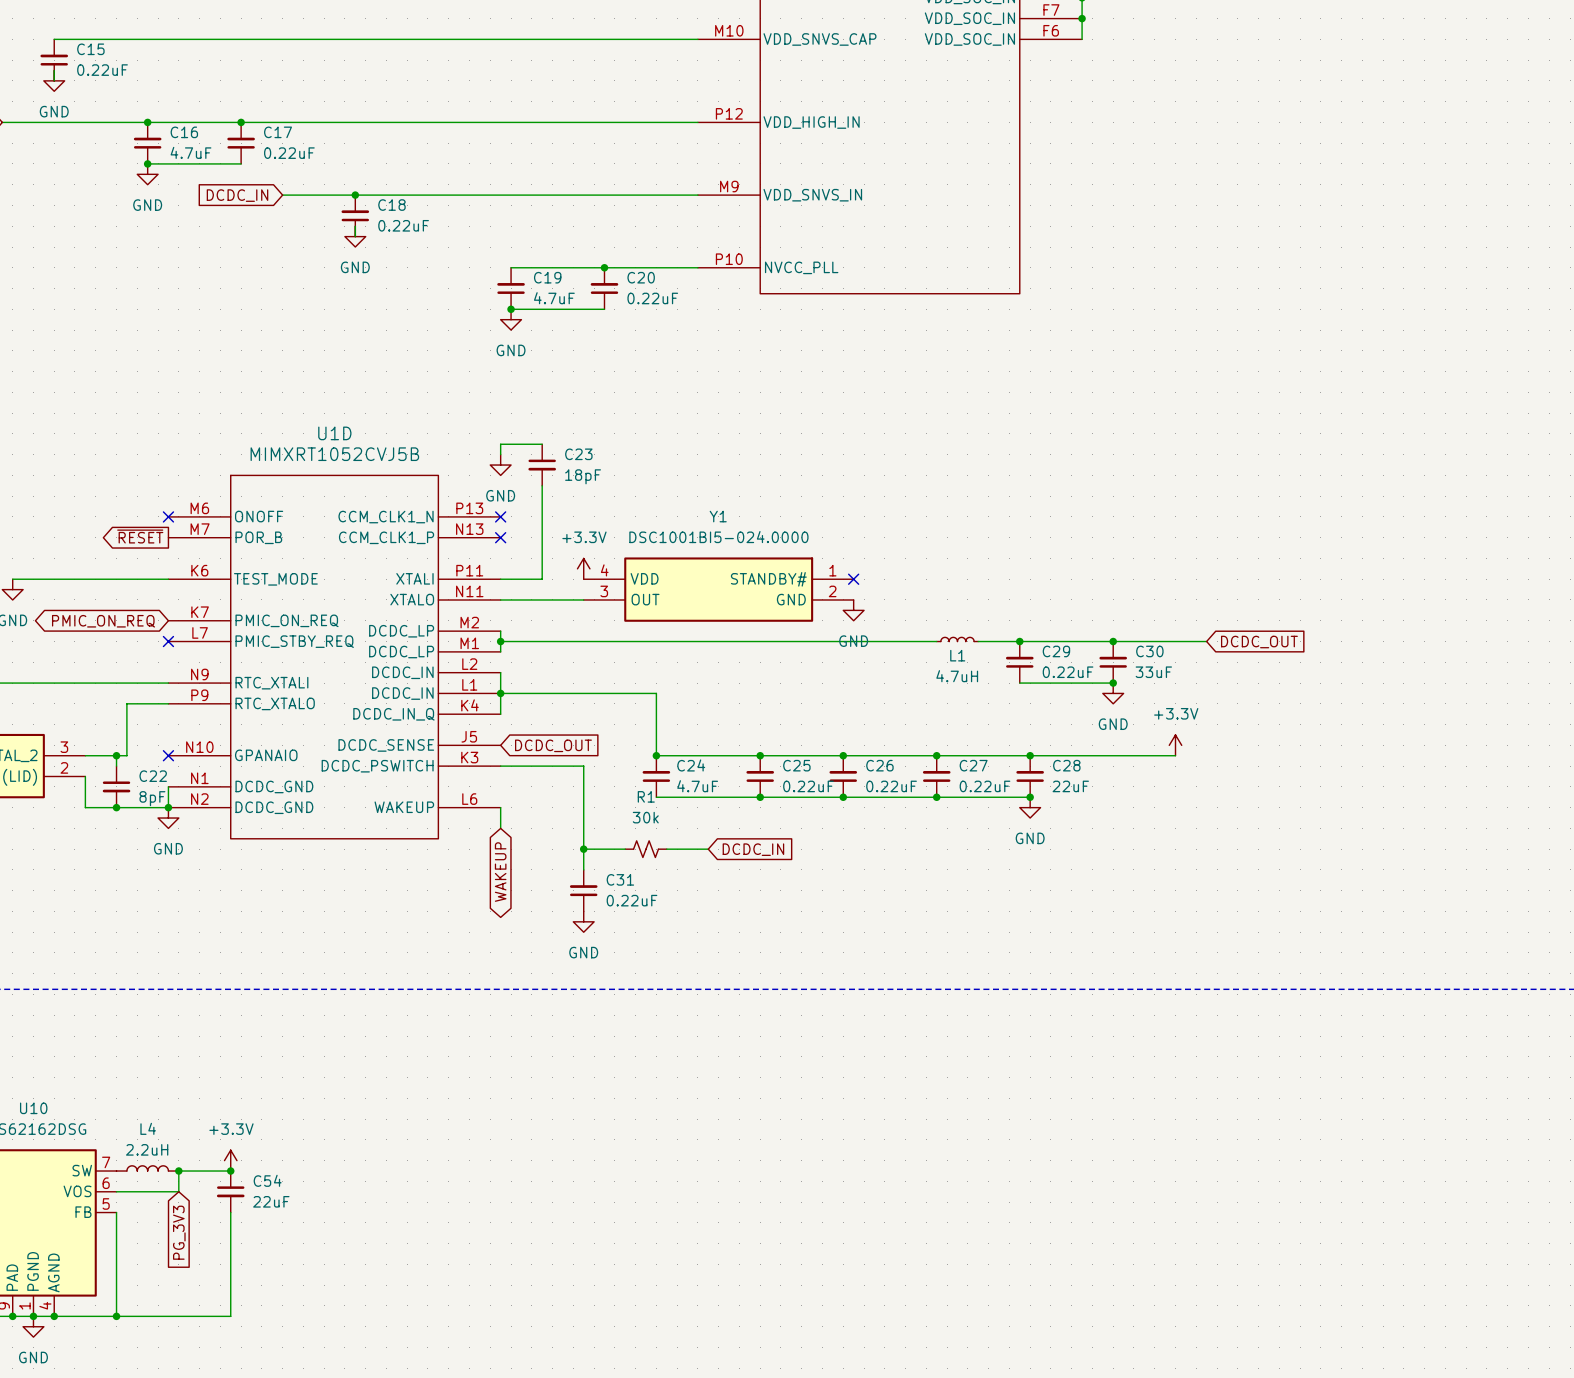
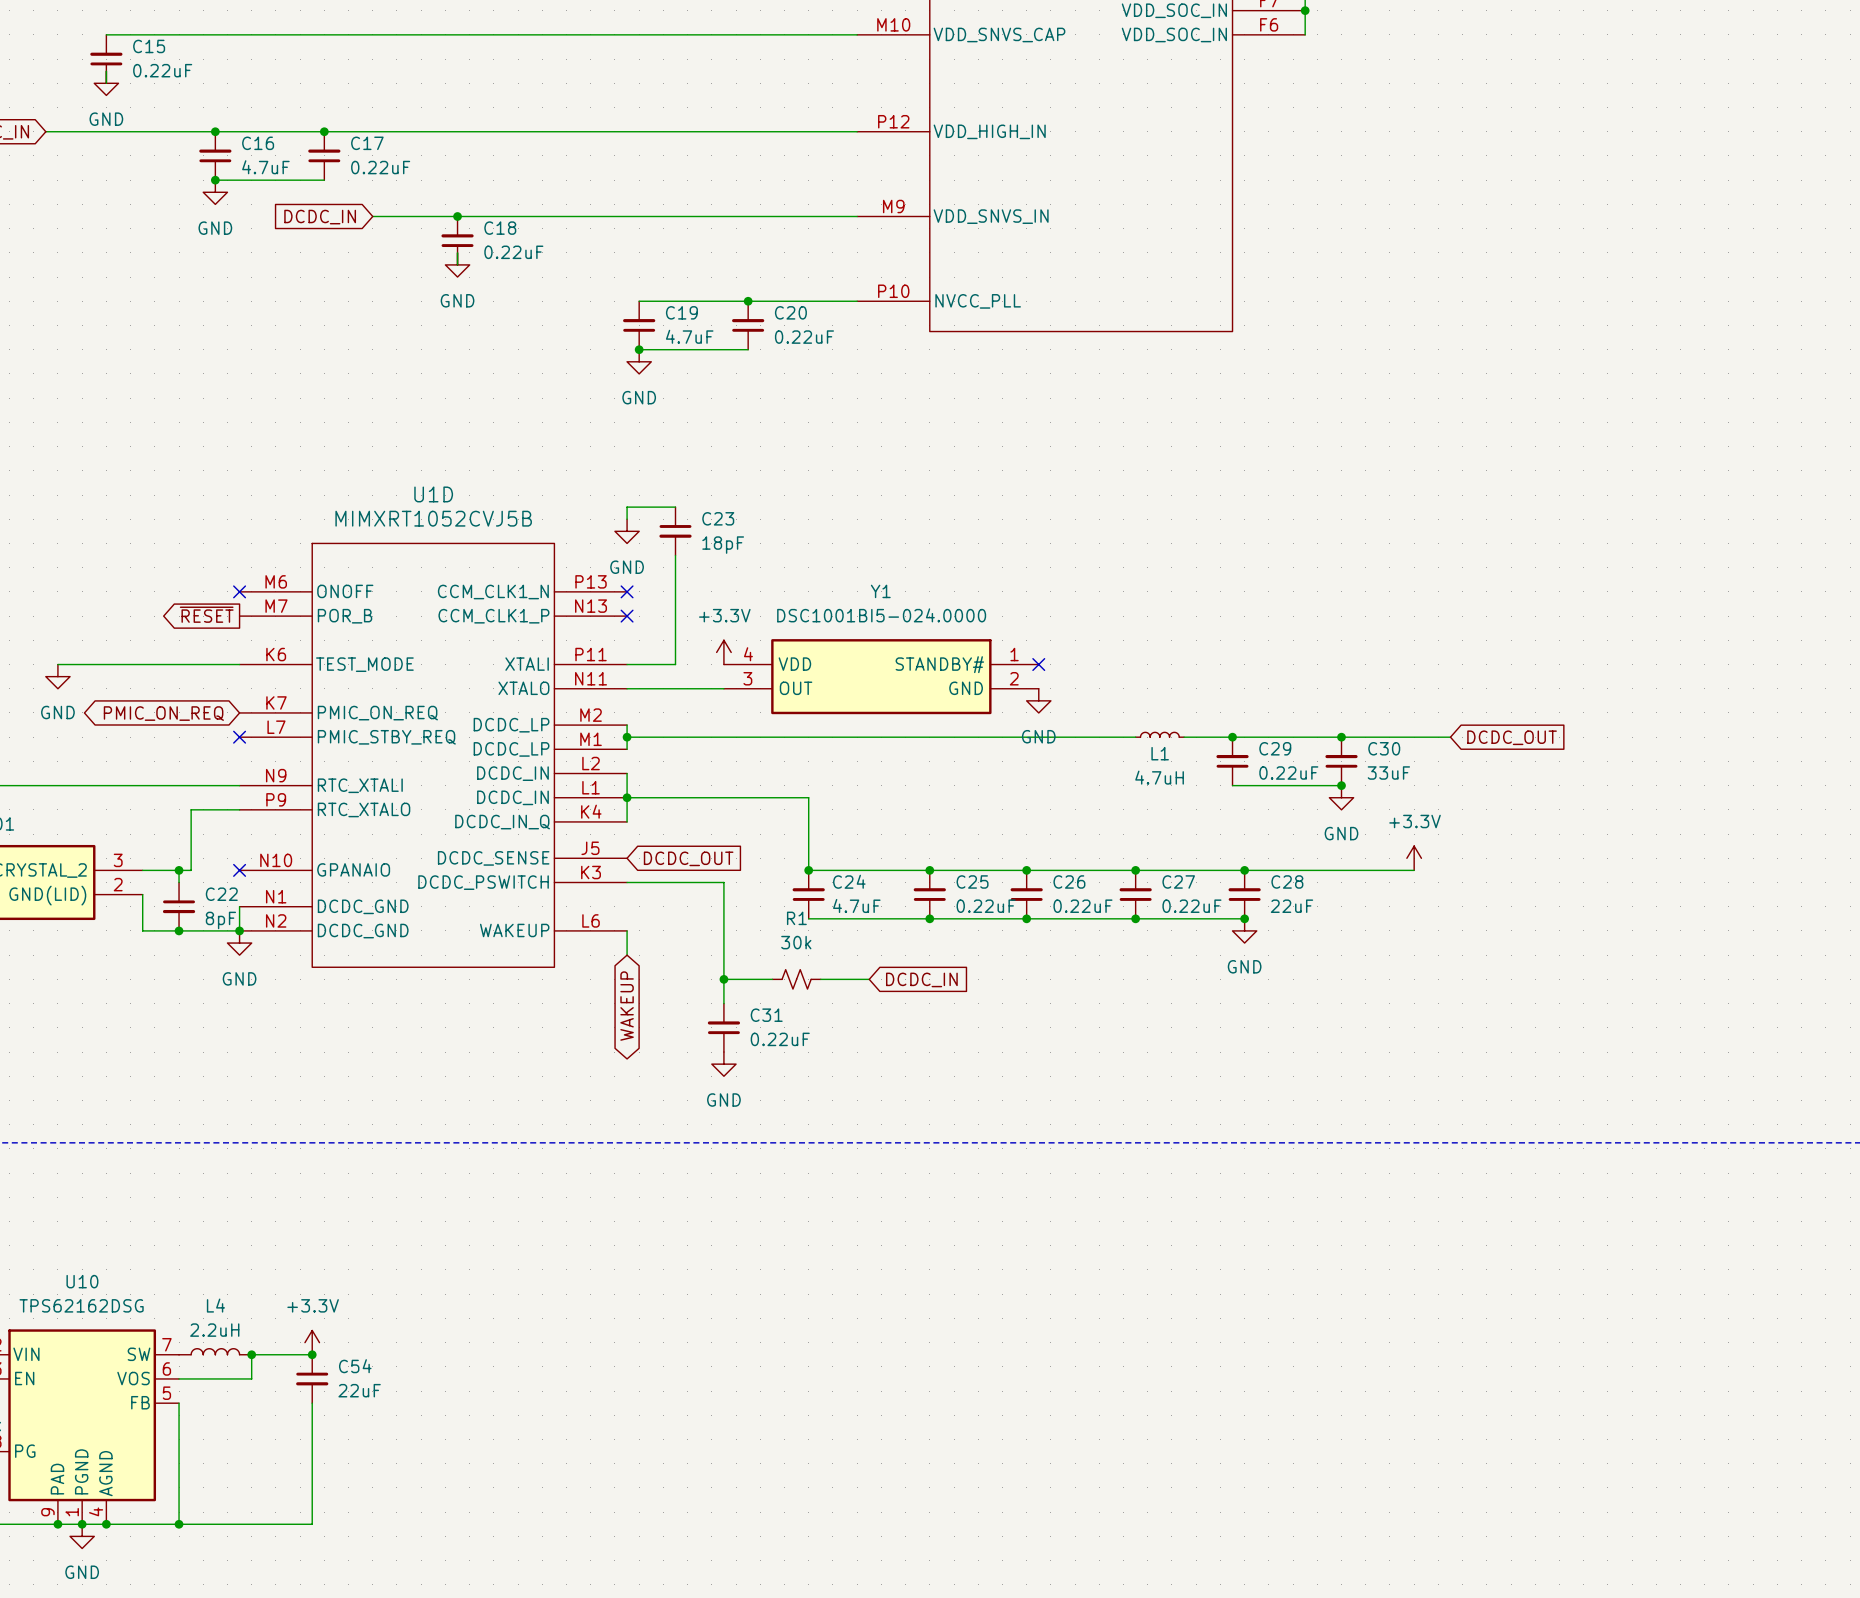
global label: PG_3V3 (179, 1232) -> none

